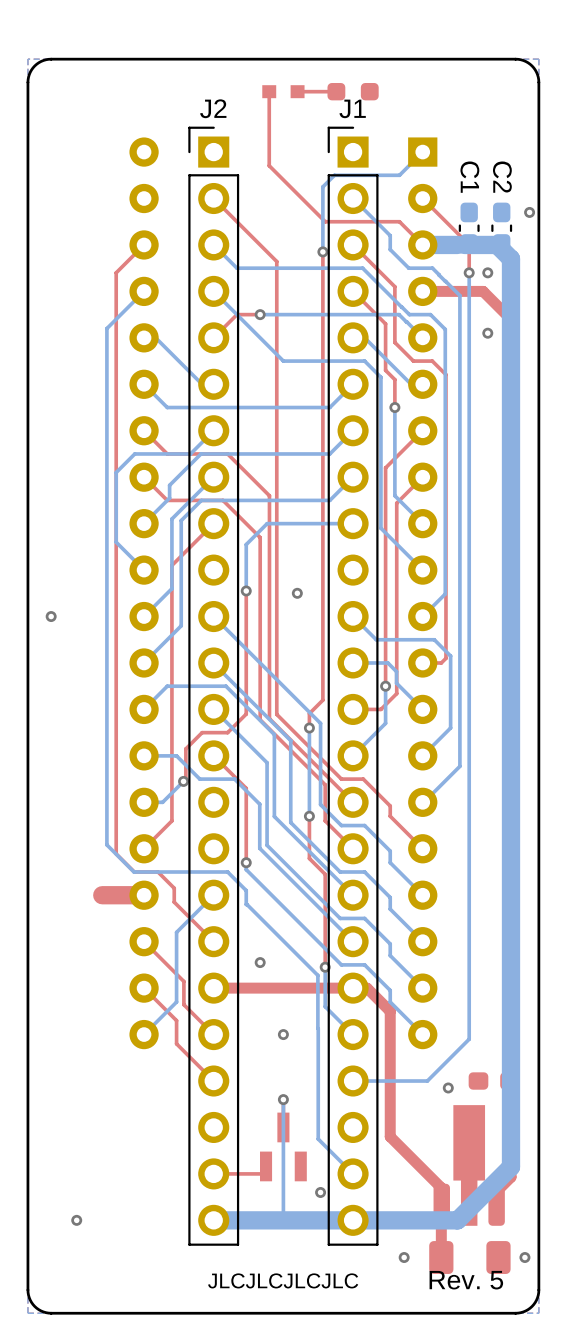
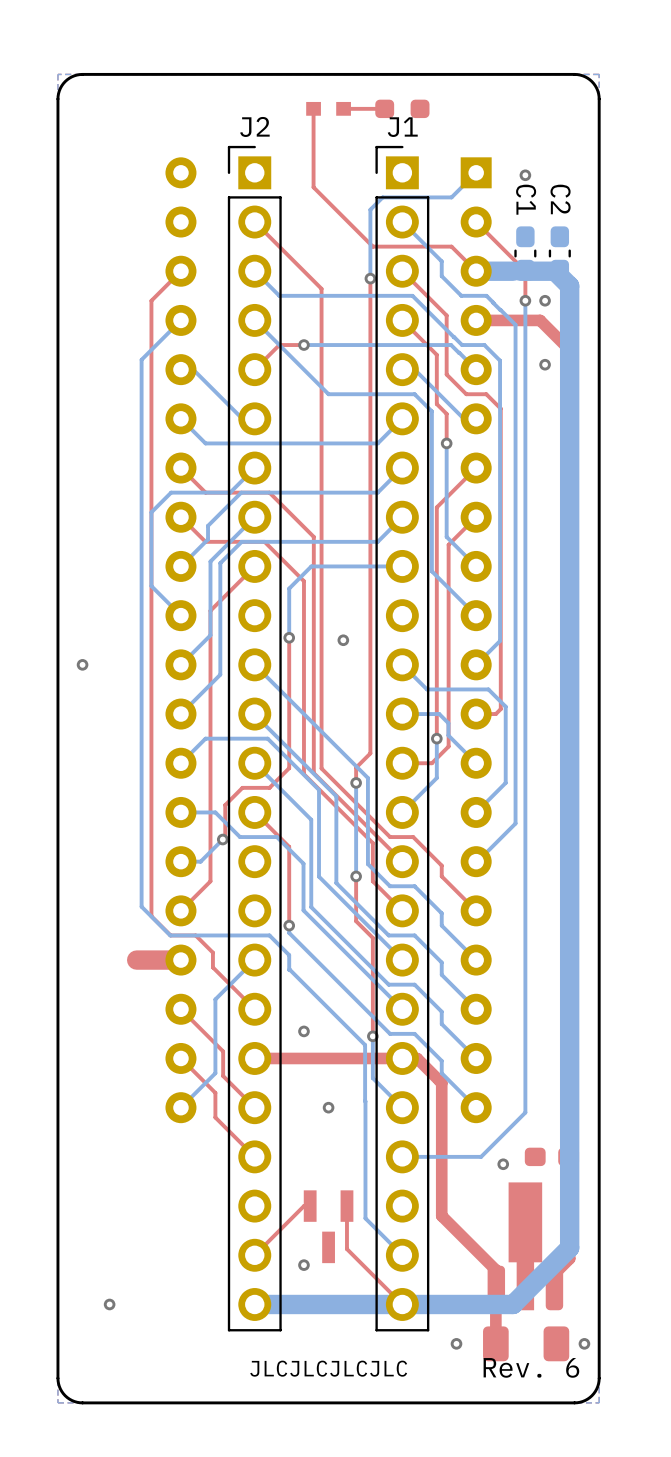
via position: (529, 212) -> (525, 175)
bottom track: (283, 1099) (283, 1220) -> none
via: (283, 1099) -> none
top track: none -> (346, 1206) (346, 1249) (402, 1304)
part rotation: 0° (283, 1146) -> 180° (328, 1226)
top track: (266, 1170) (262, 1173) (213, 1173) -> (310, 1206) (303, 1206) (254, 1255)
via: none -> (303, 1265)
via: (320, 1192) -> none
text: Rev. 5 (466, 1280) -> Rev. 6 (531, 1367)

